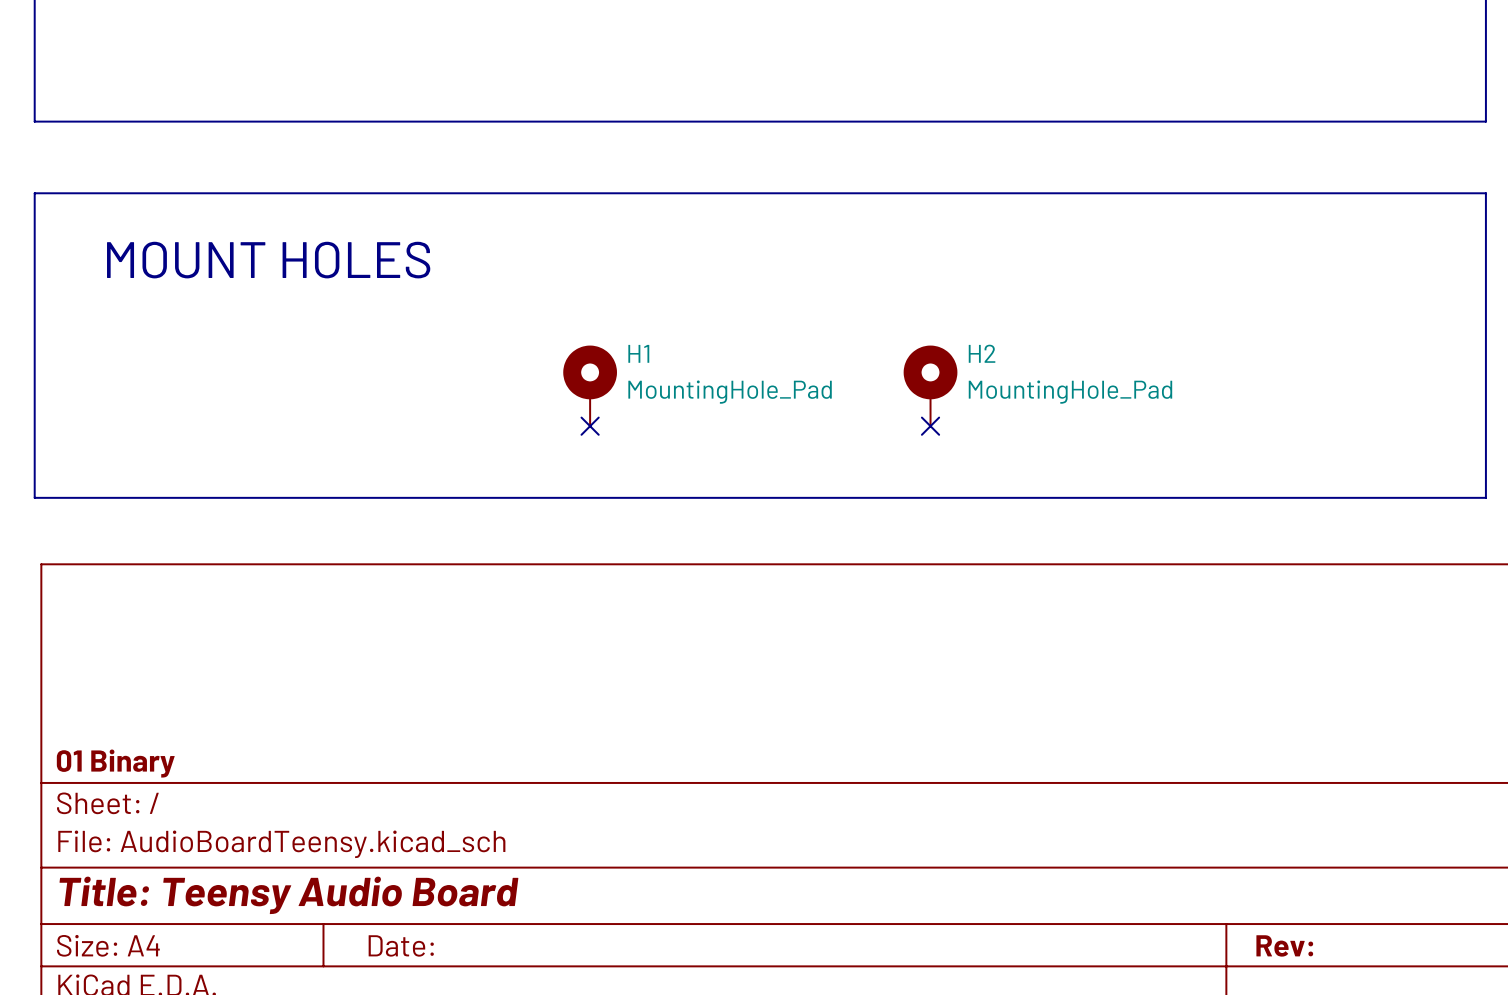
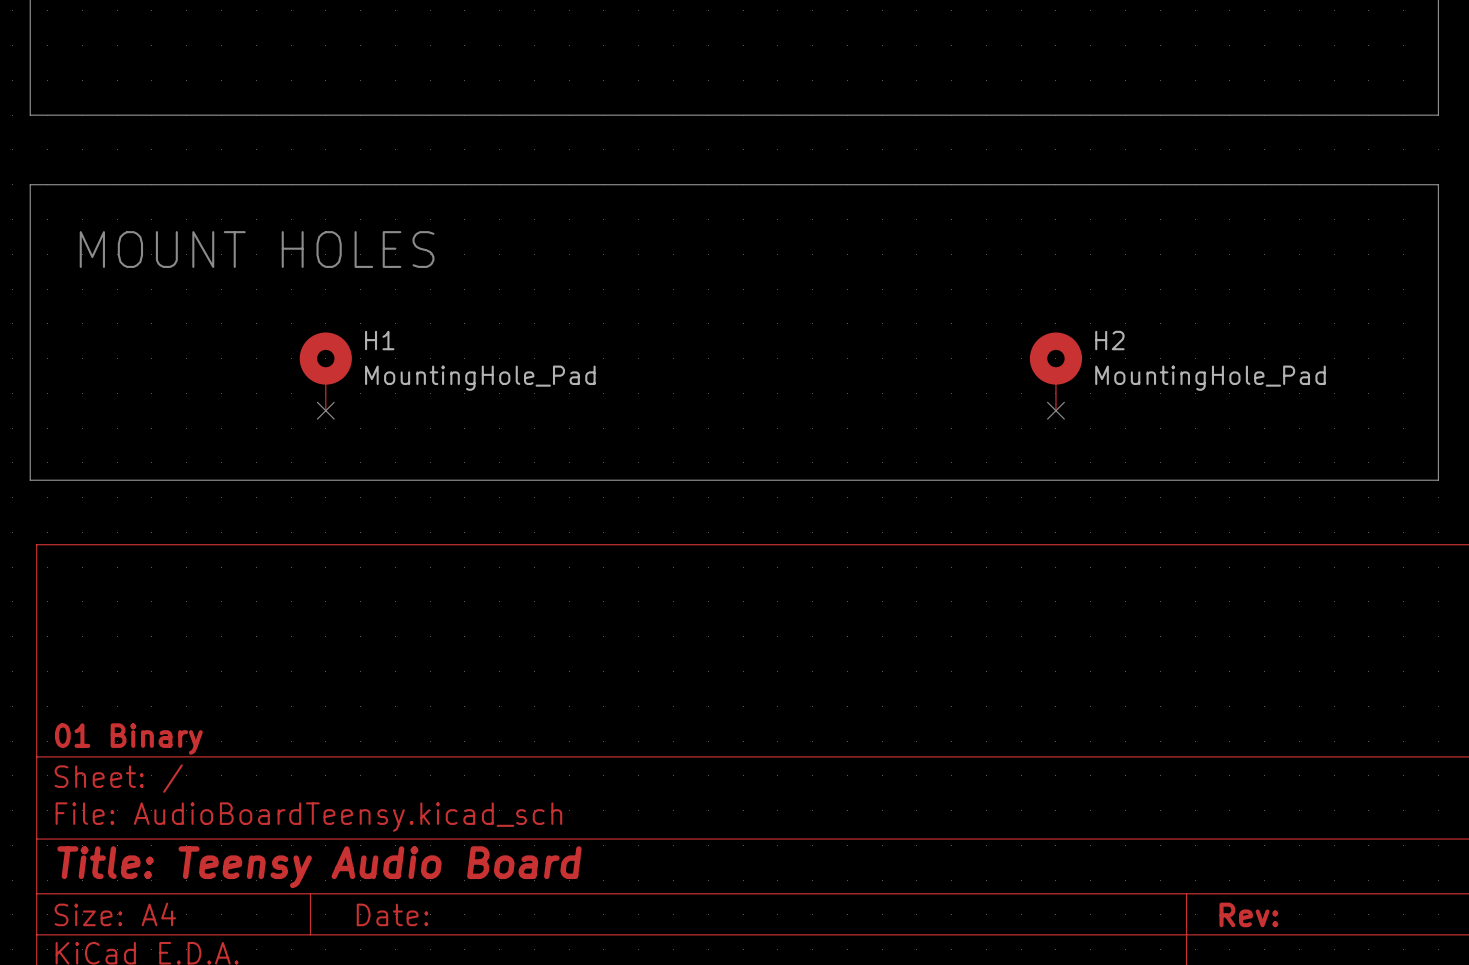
H1 position: (590, 385) -> (325, 371)
H2 position: (930, 385) -> (1055, 371)
no-connect mark: none -> (325, 410)
no-connect mark: (590, 426) -> none
no-connect mark: (930, 426) -> none
no-connect mark: none -> (1055, 410)

